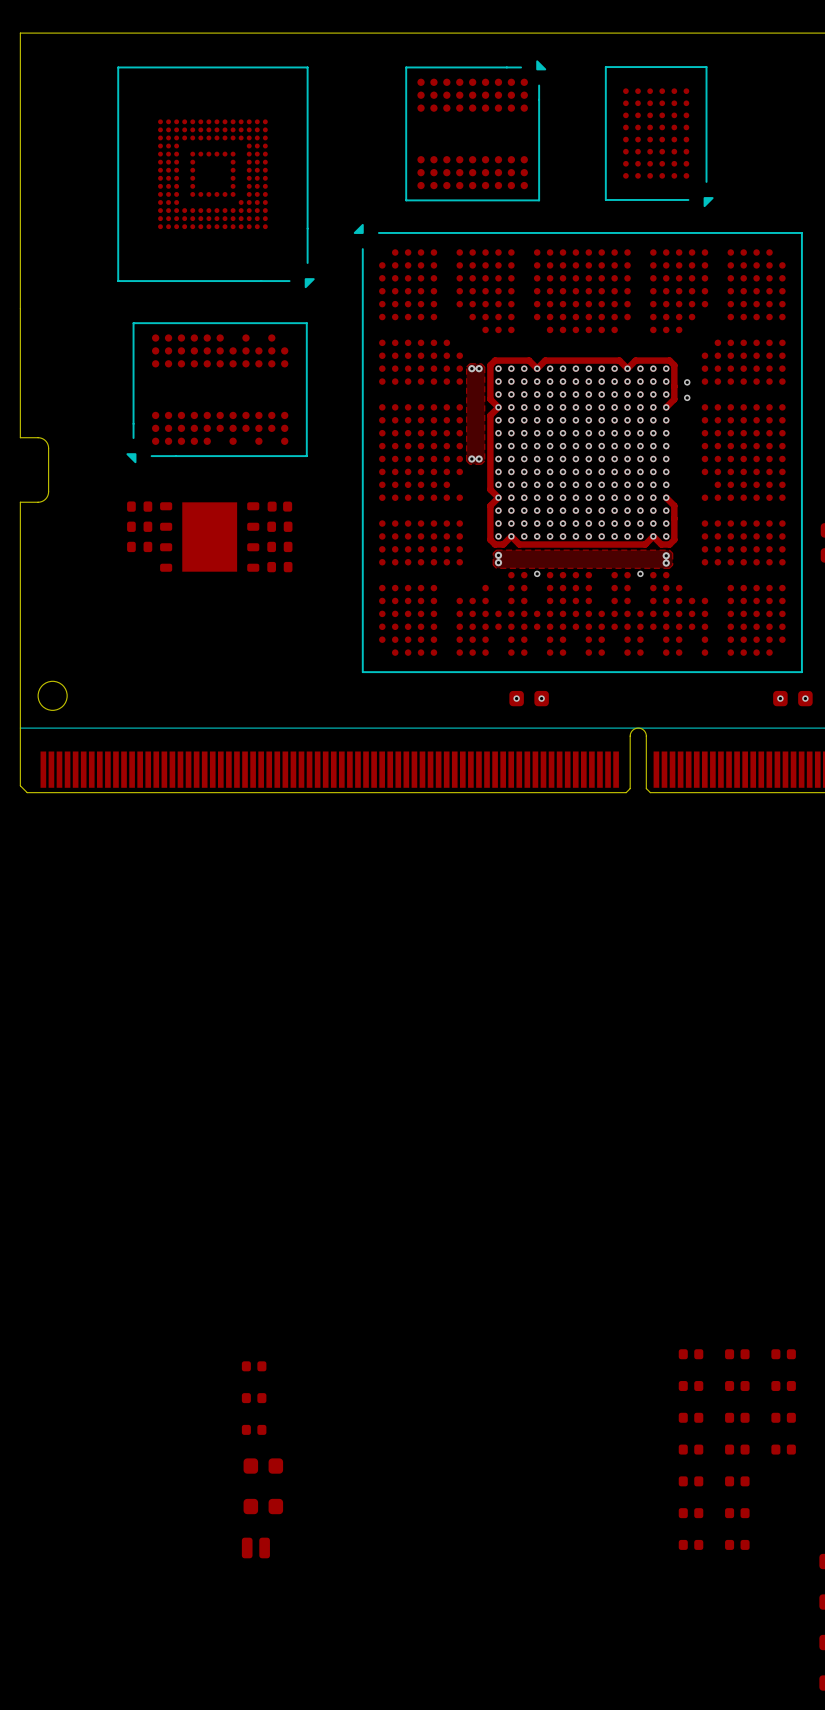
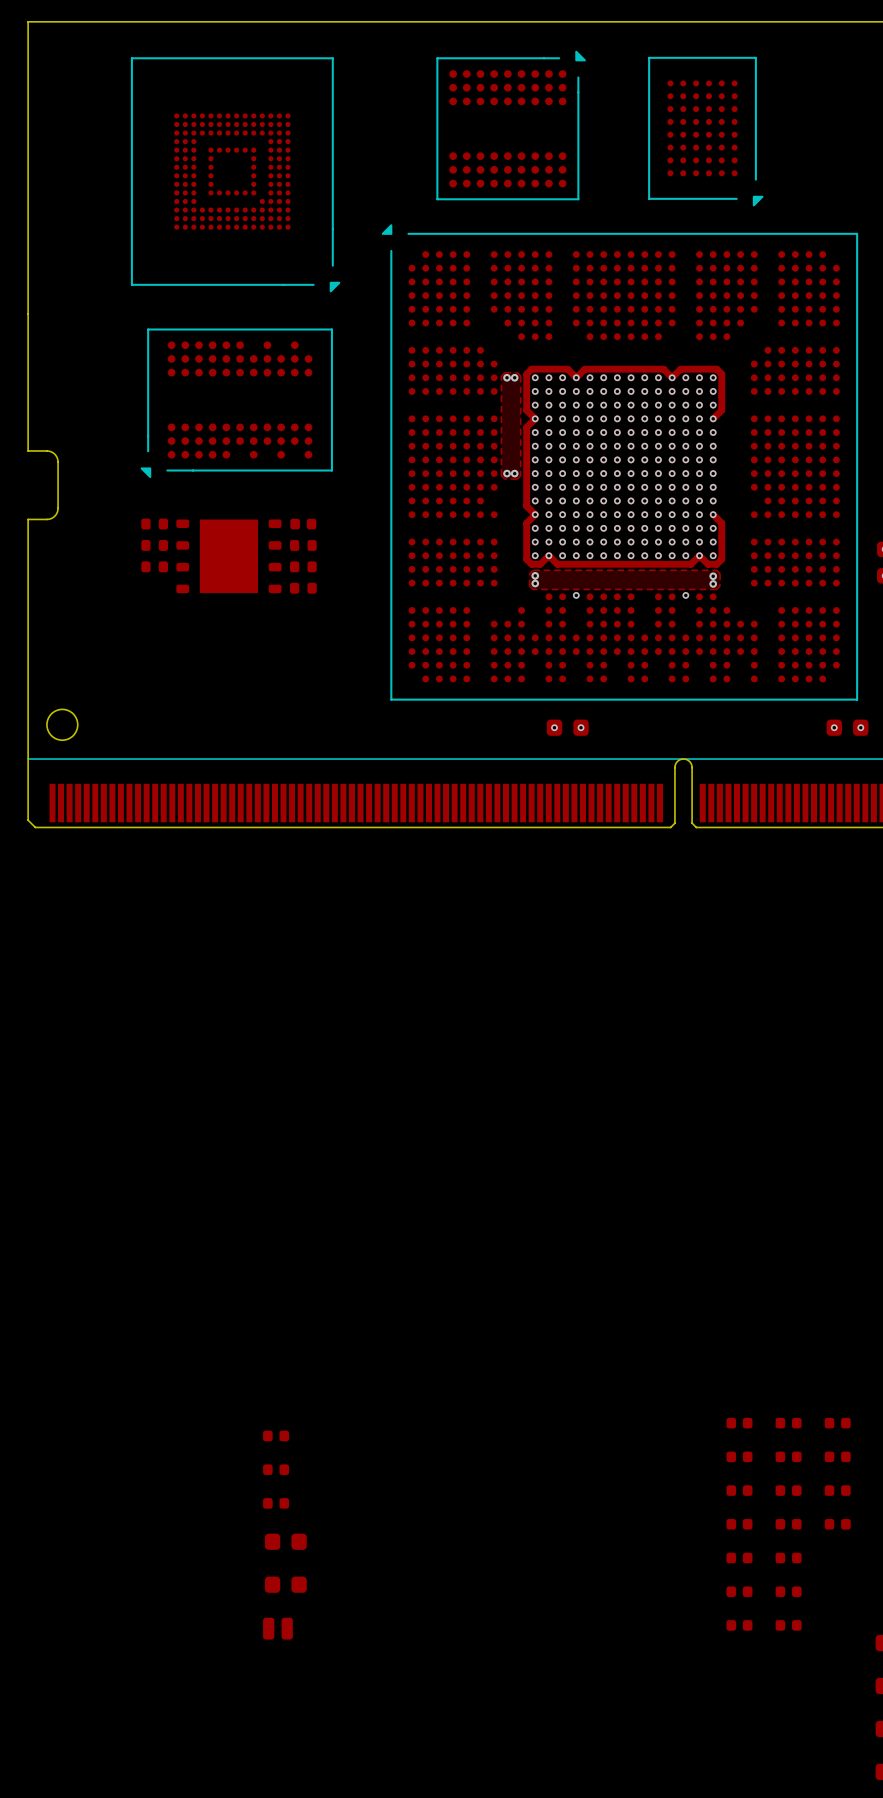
via: (687, 382) -> none
via: (687, 397) -> none

